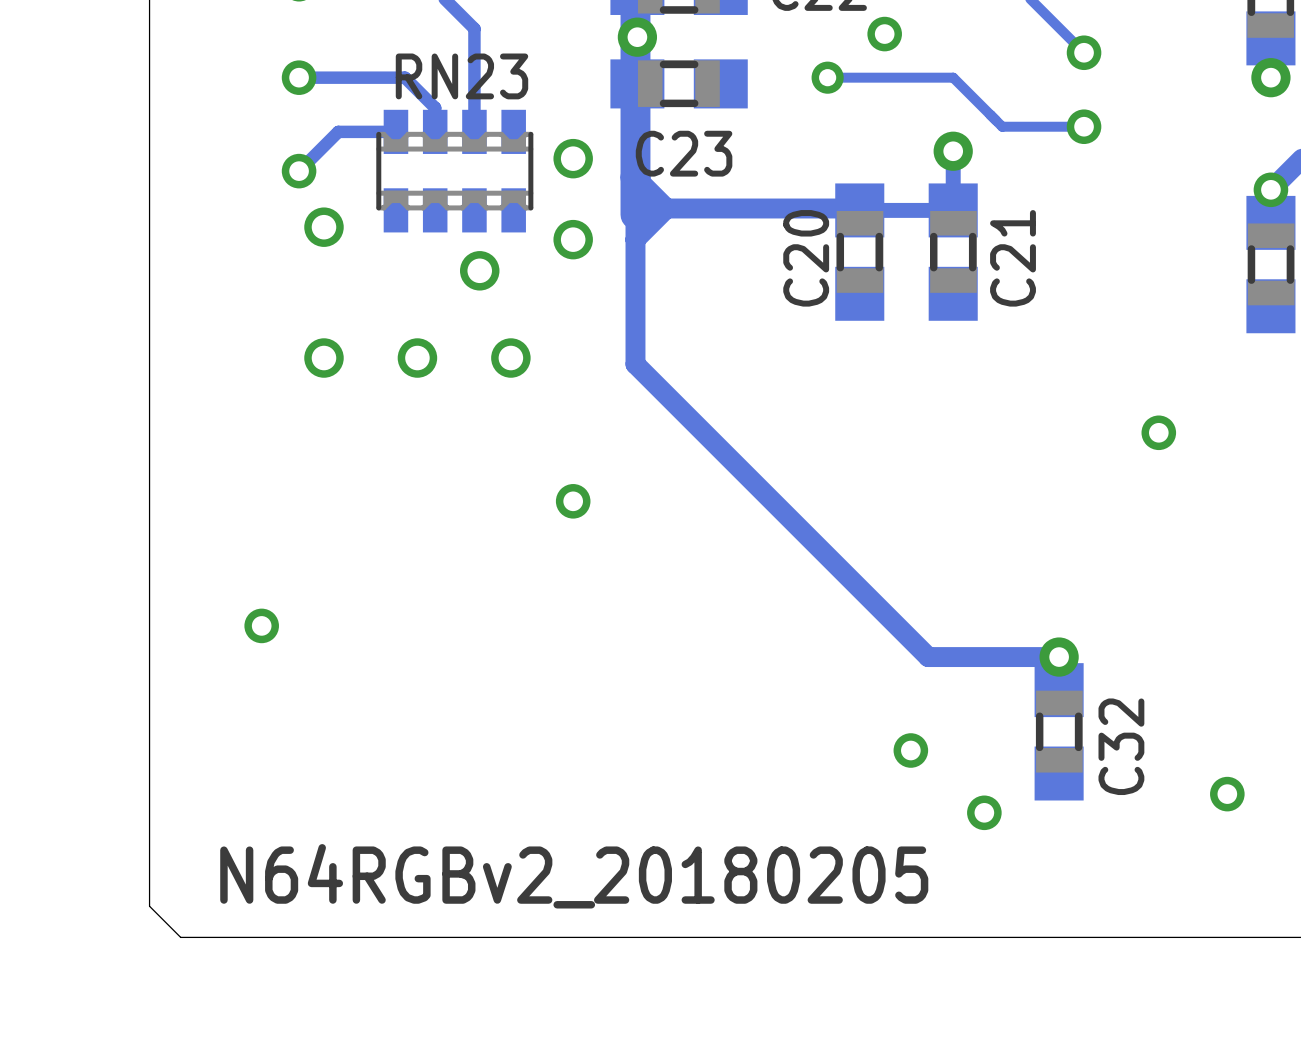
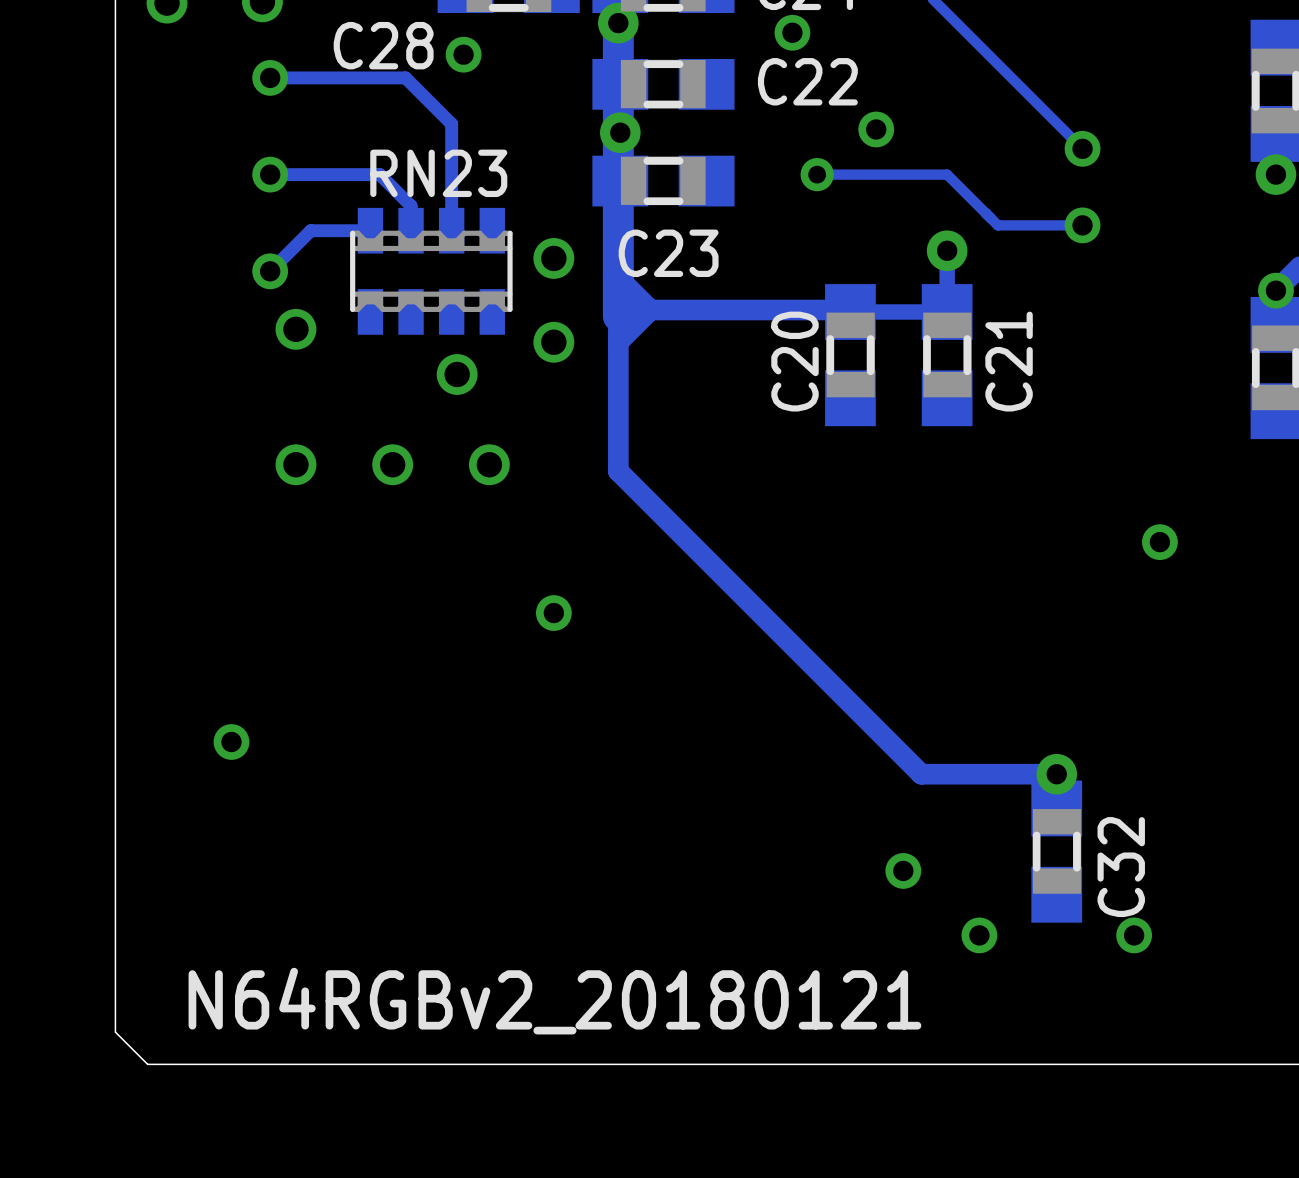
via: (1227, 794) -> none
via: none -> (1134, 935)
text: N64RGBv2_20180205 (574, 876) -> N64RGBv2_20180121 (554, 1001)

